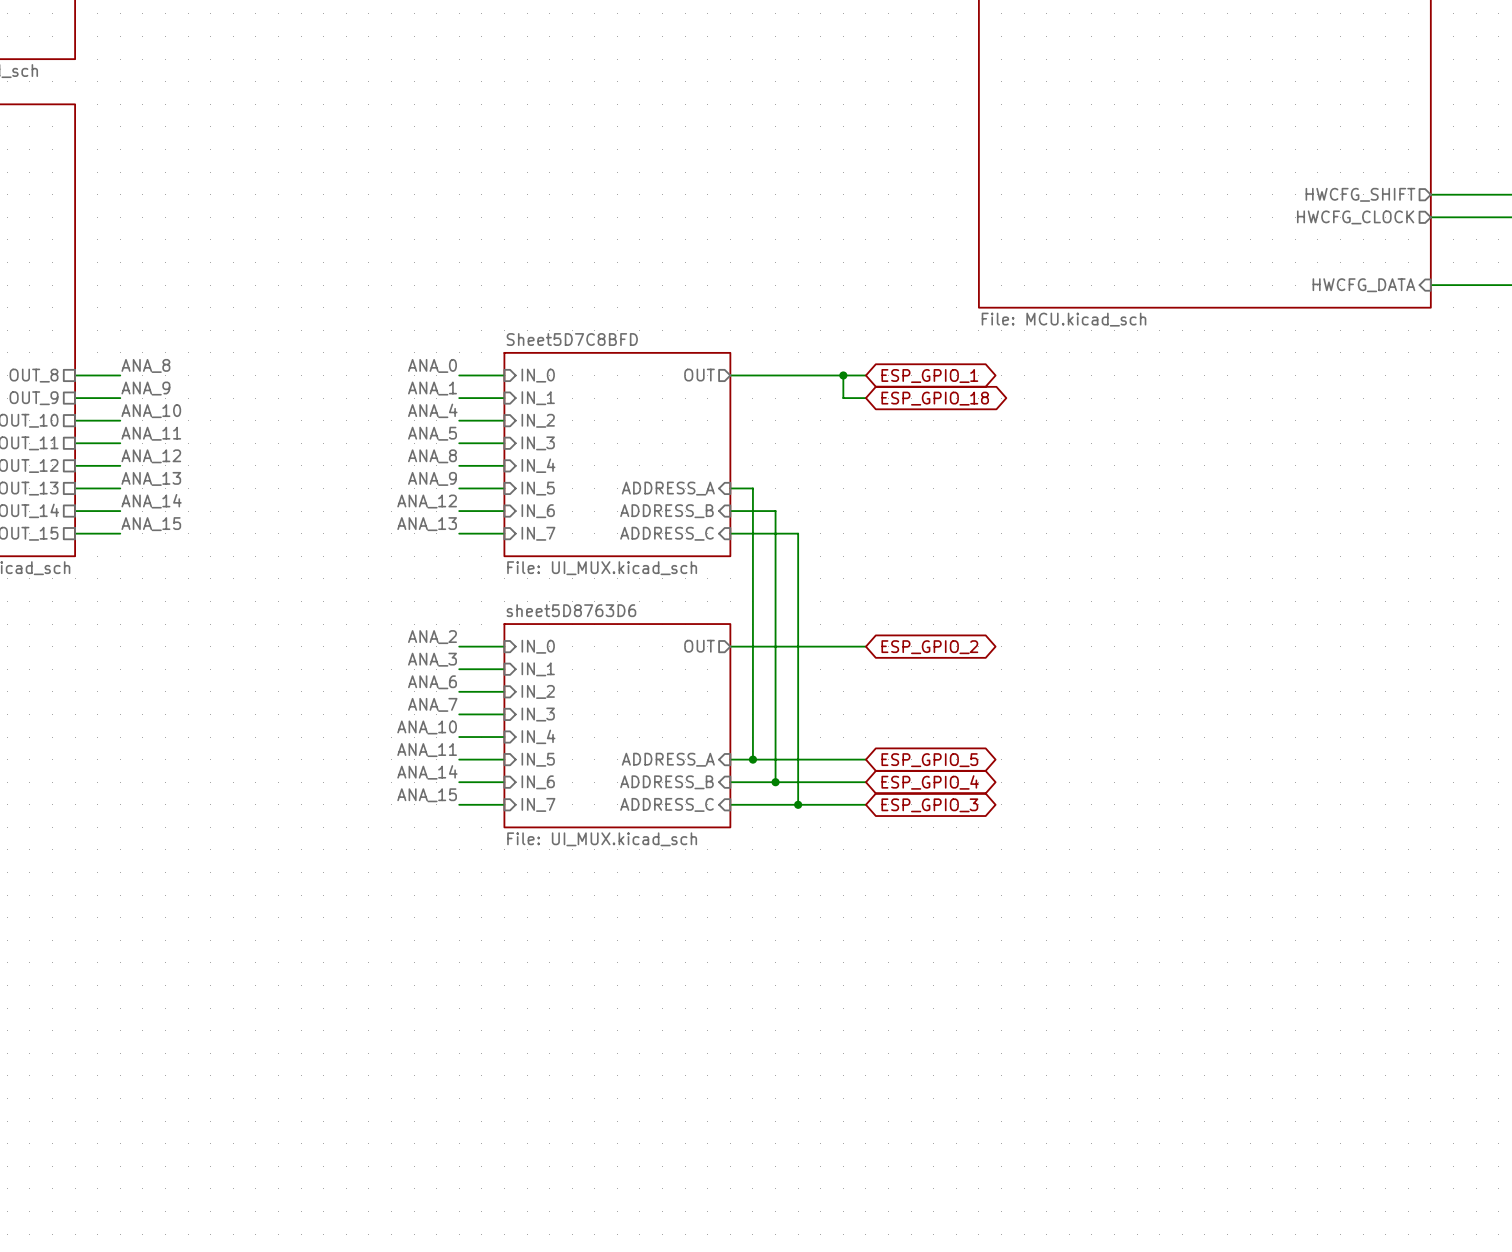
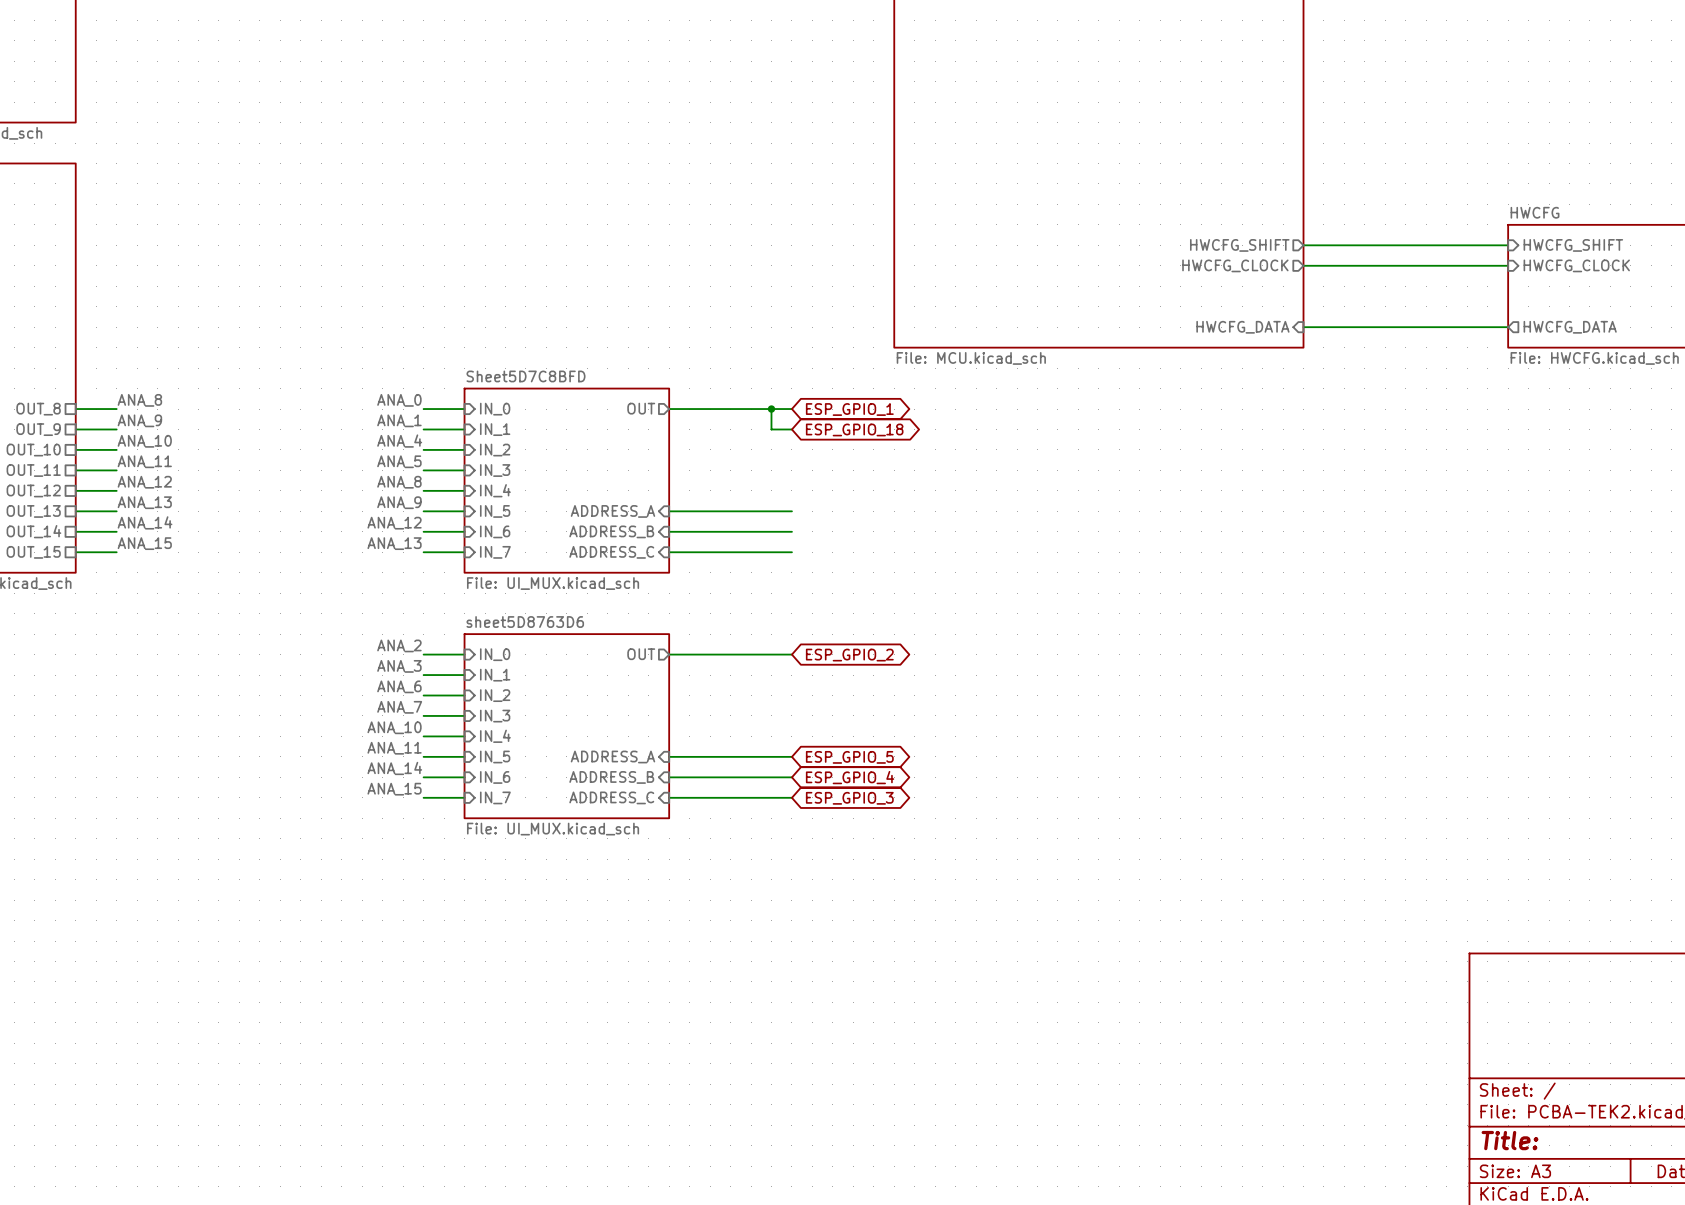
wire: (752, 488) (752, 759) -> (689, 511) (791, 511)
wire: (775, 511) (775, 782) -> (710, 531) (791, 531)
wire: (798, 533) (798, 804) -> (730, 552) (791, 552)
junction: (752, 759) -> none
junction: (775, 782) -> none
junction: (798, 804) -> none

